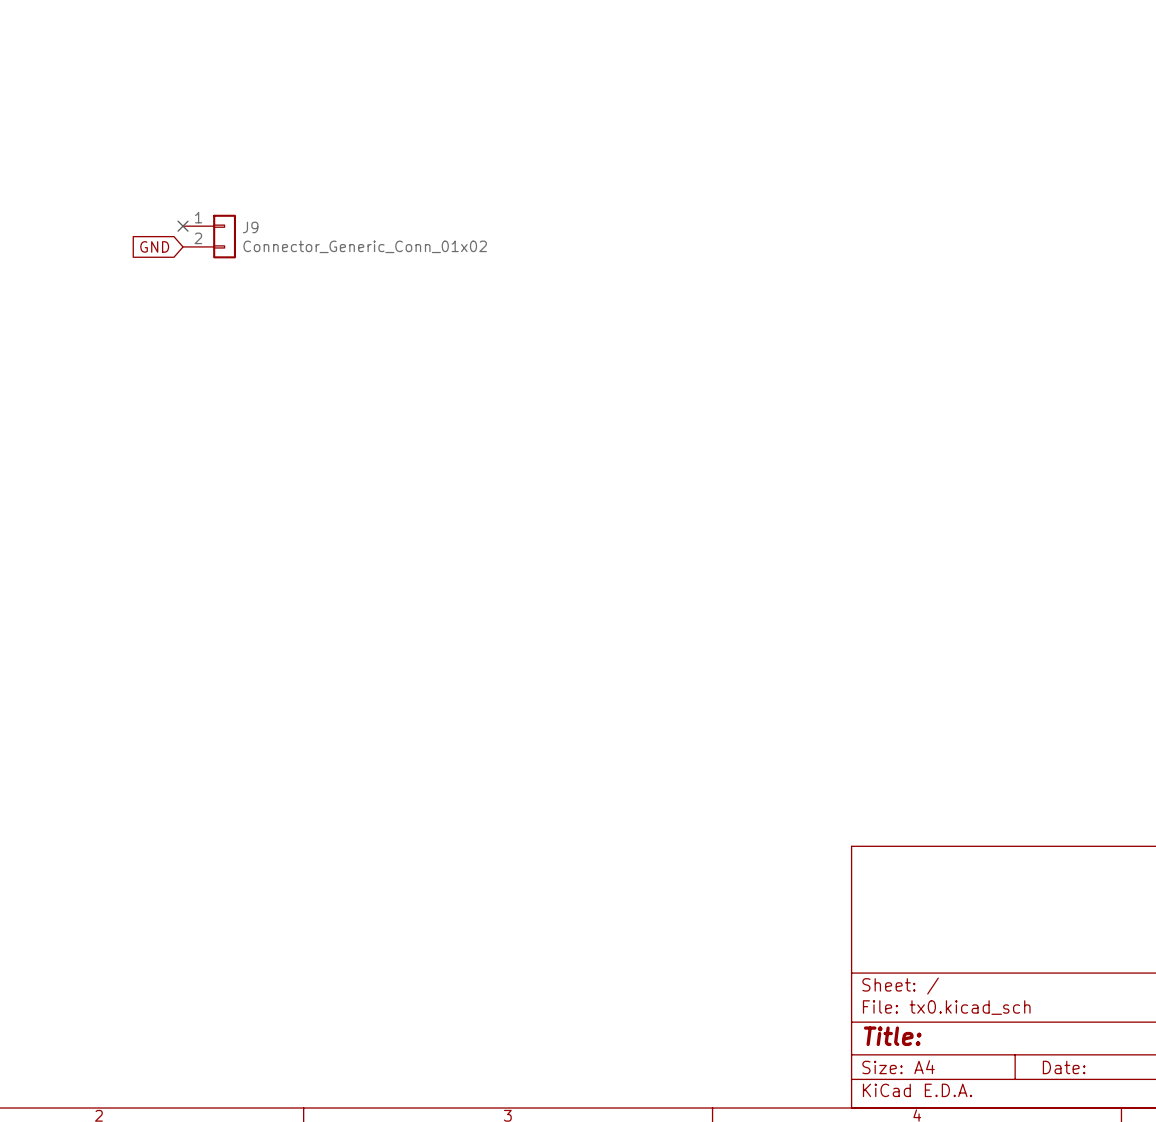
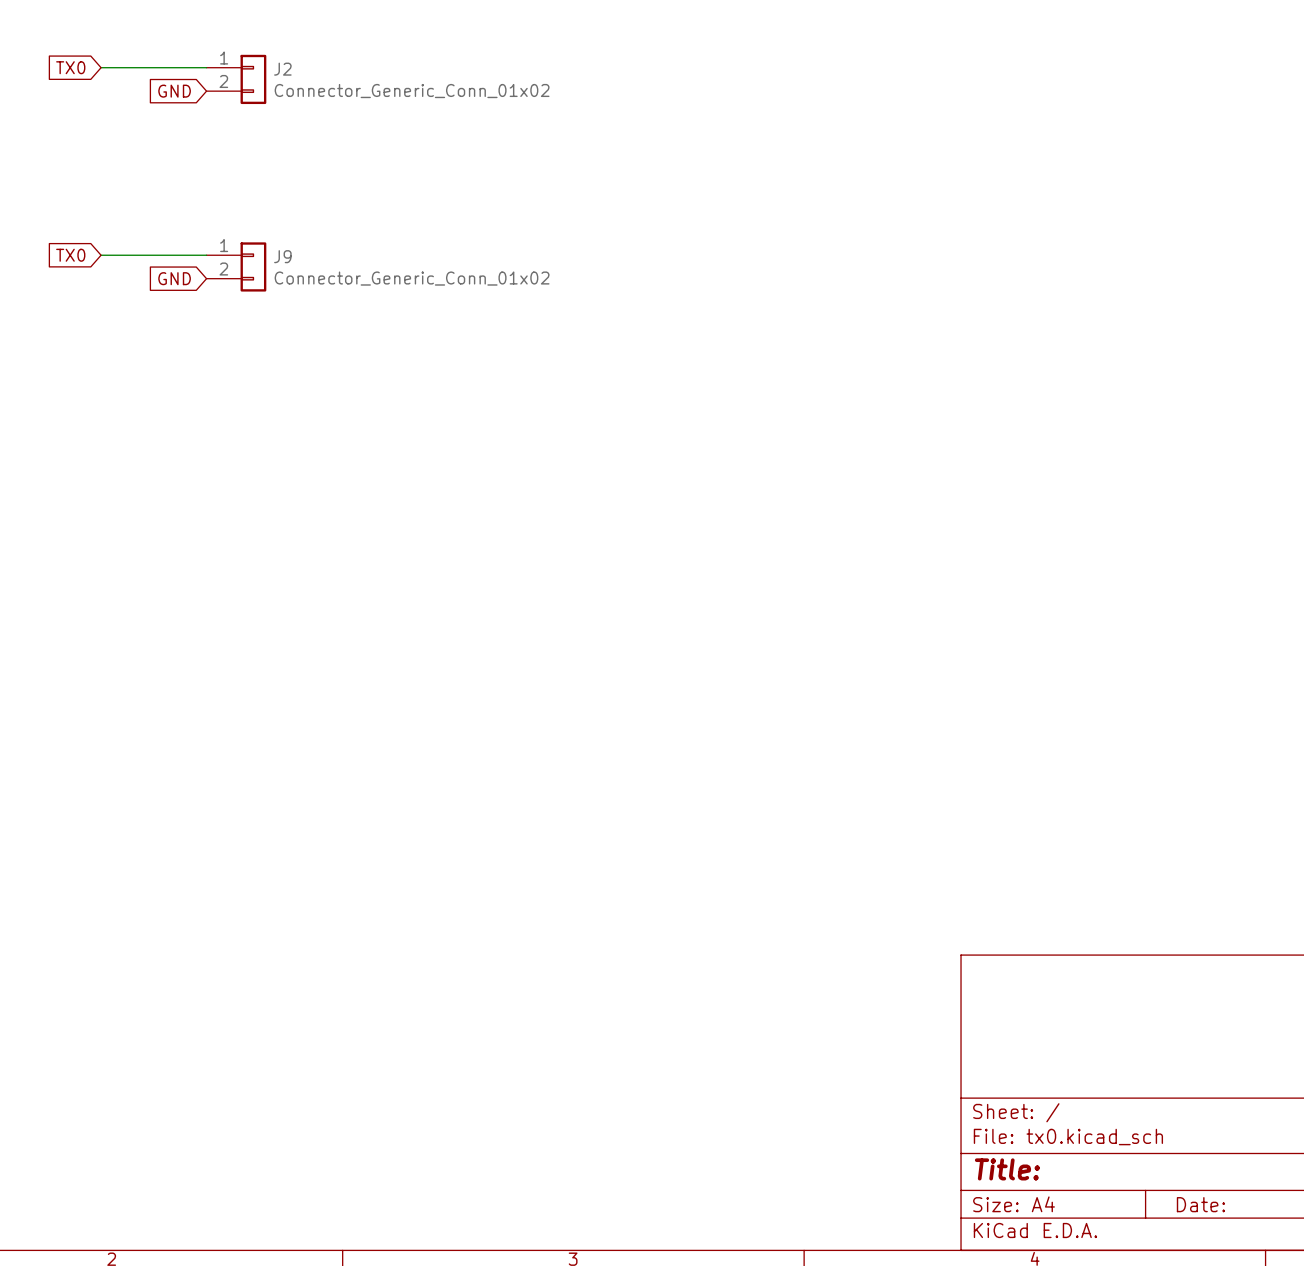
global label: none -> TX0 (70, 67)
wire: none -> (101, 67) (206, 67)
J2: none -> Connector_Generic_Conn_01x02 (236, 79)
global label: none -> GND (174, 91)
global label: none -> TX0 (70, 255)
wire: none -> (101, 255) (206, 255)
no-connect mark: (183, 226) -> none

